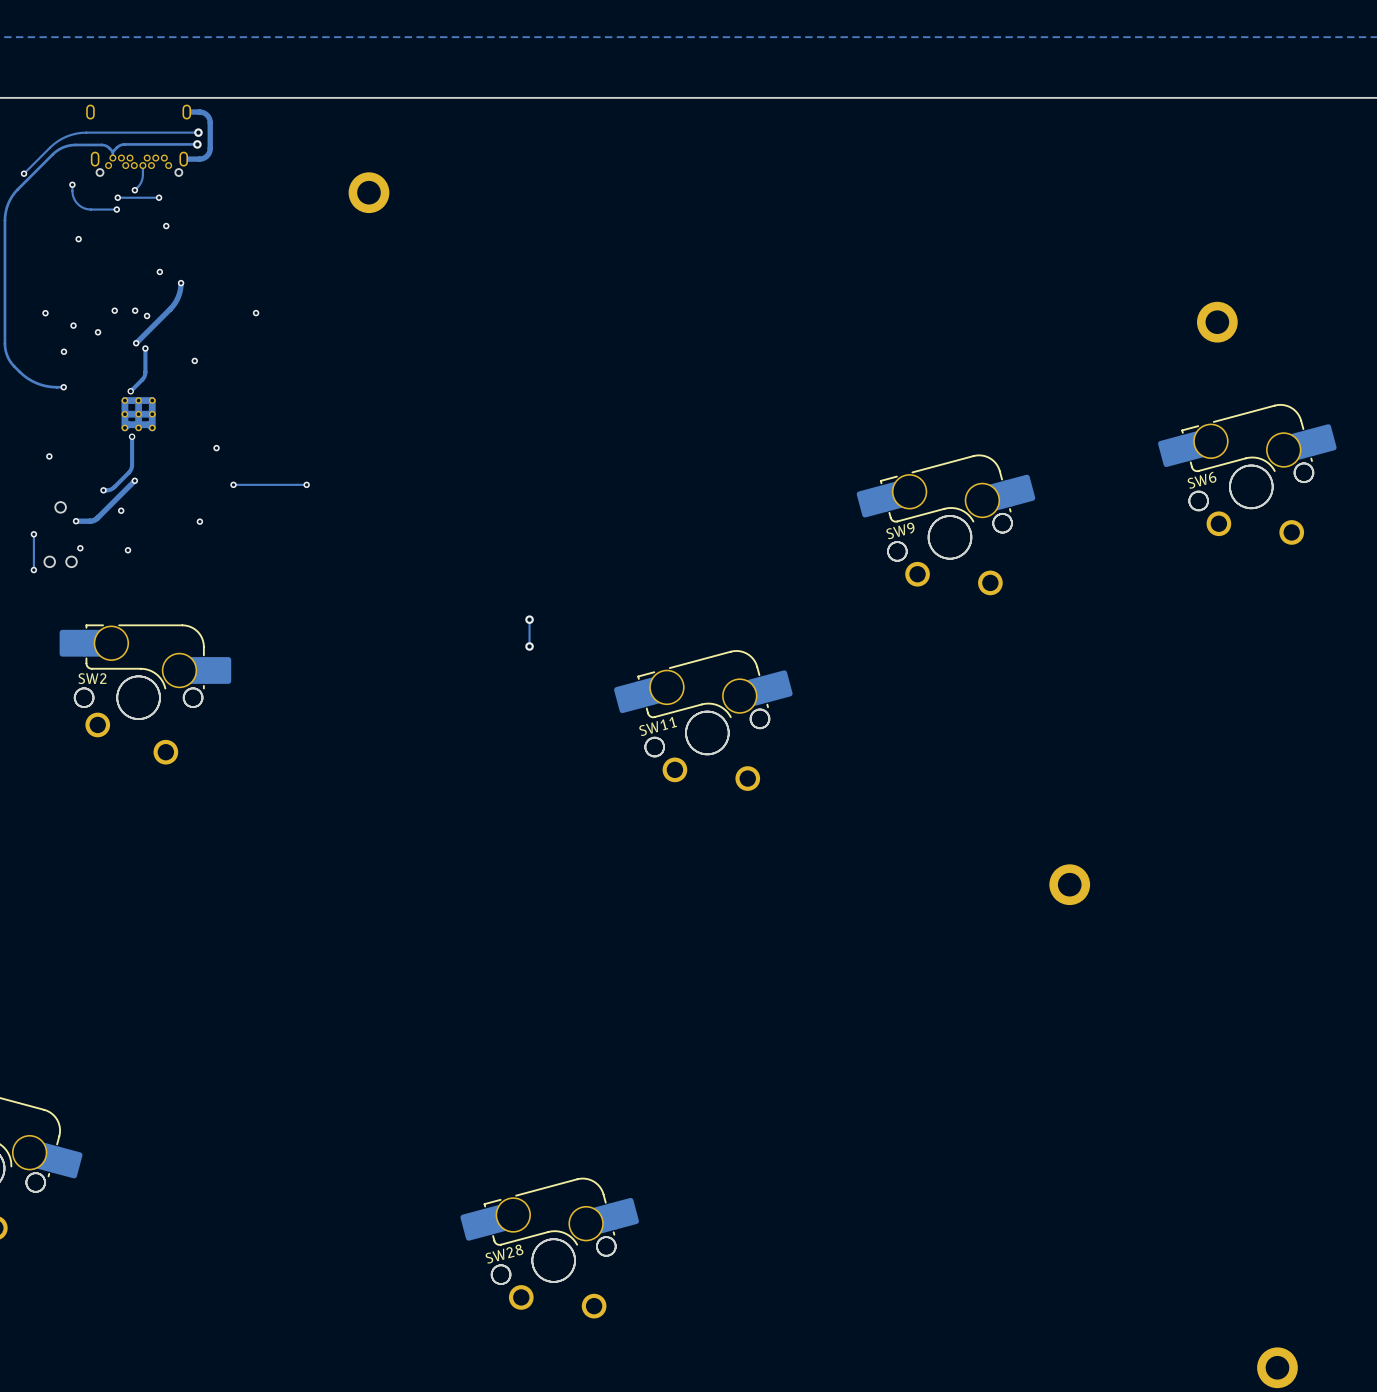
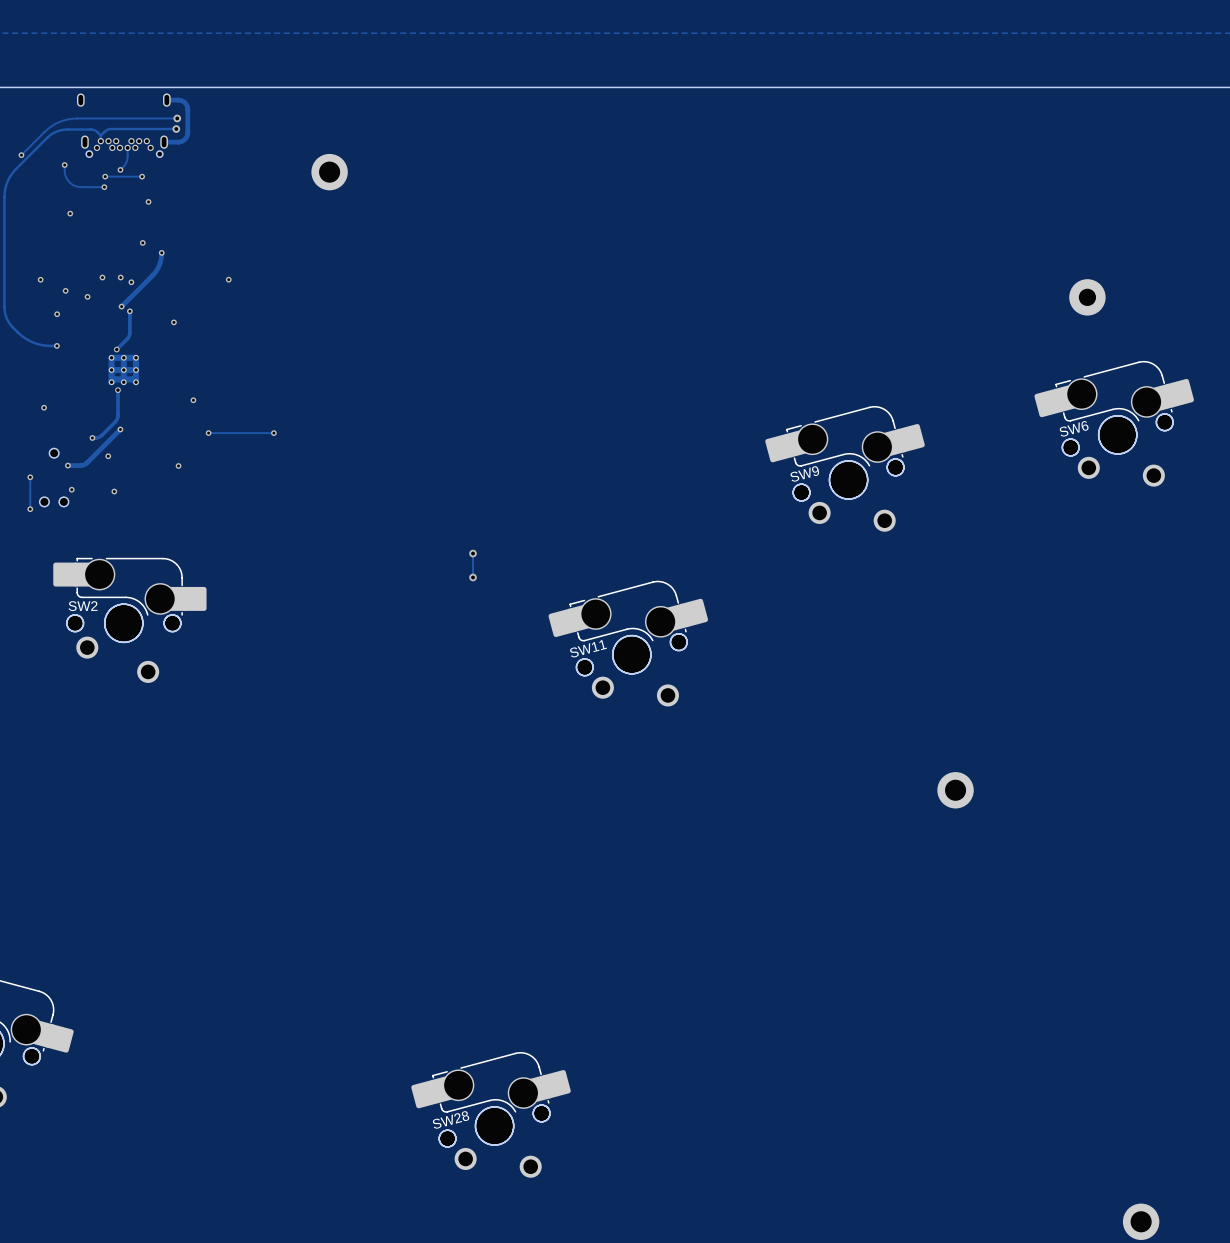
part footprint: [1196, 301, 1238, 343] -> [1069, 279, 1106, 316]

